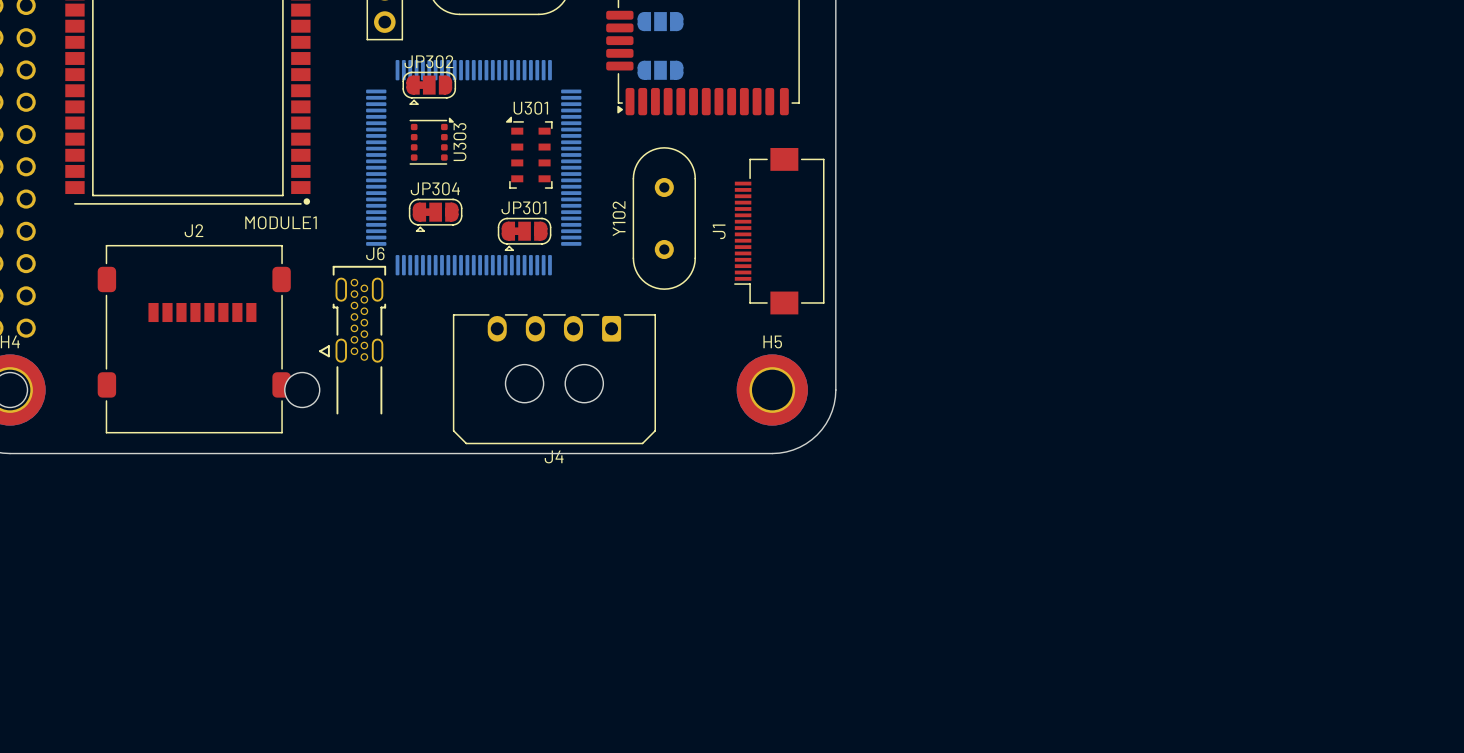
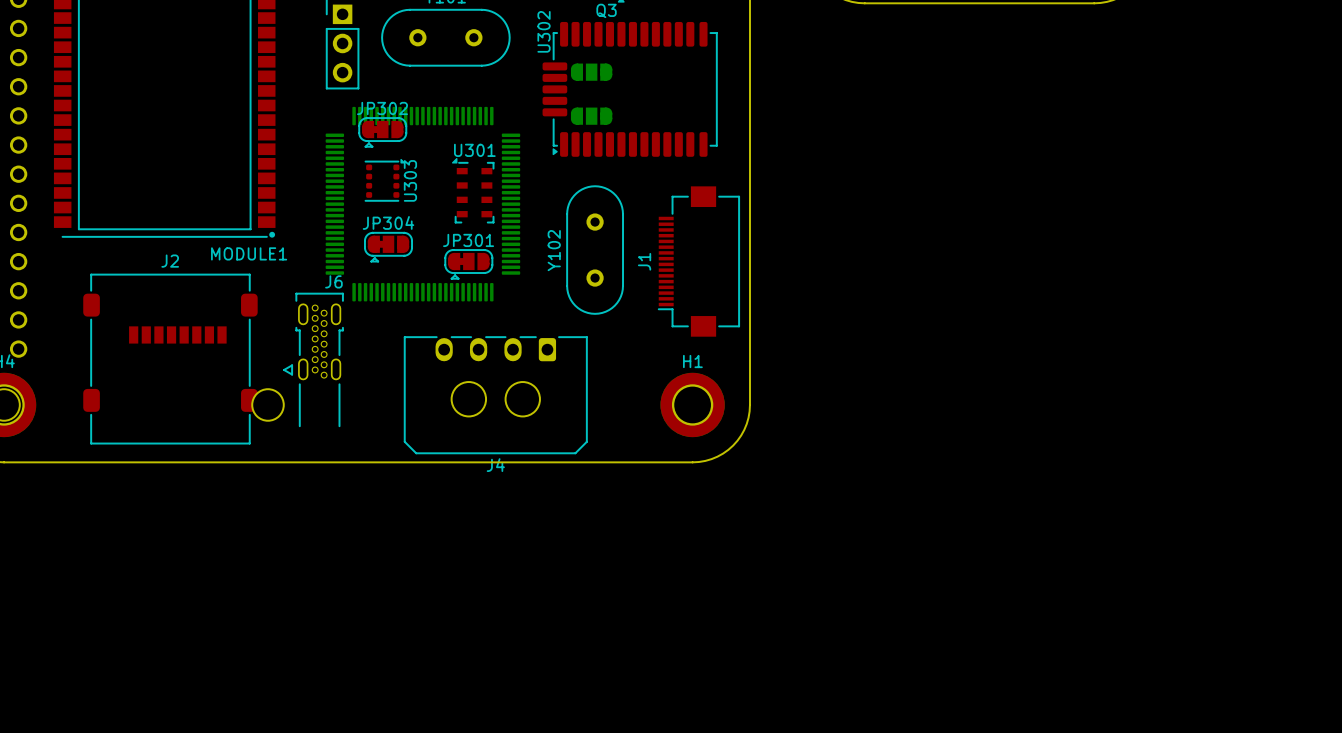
H5 name: H5 (772, 341) -> H1 (692, 361)

